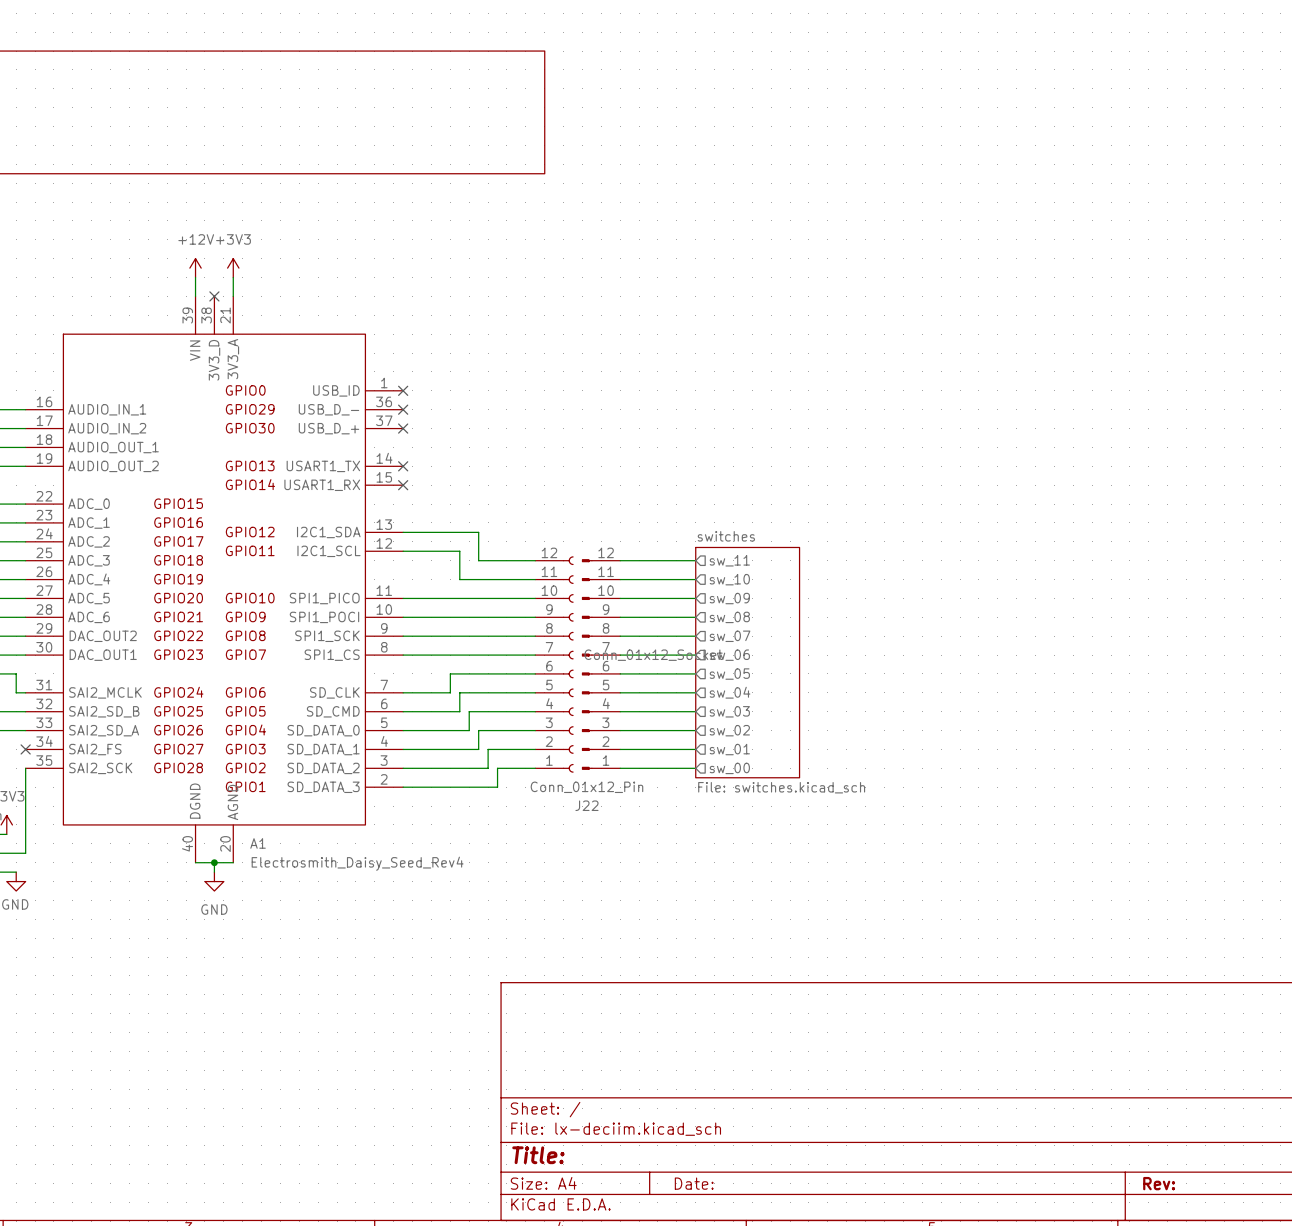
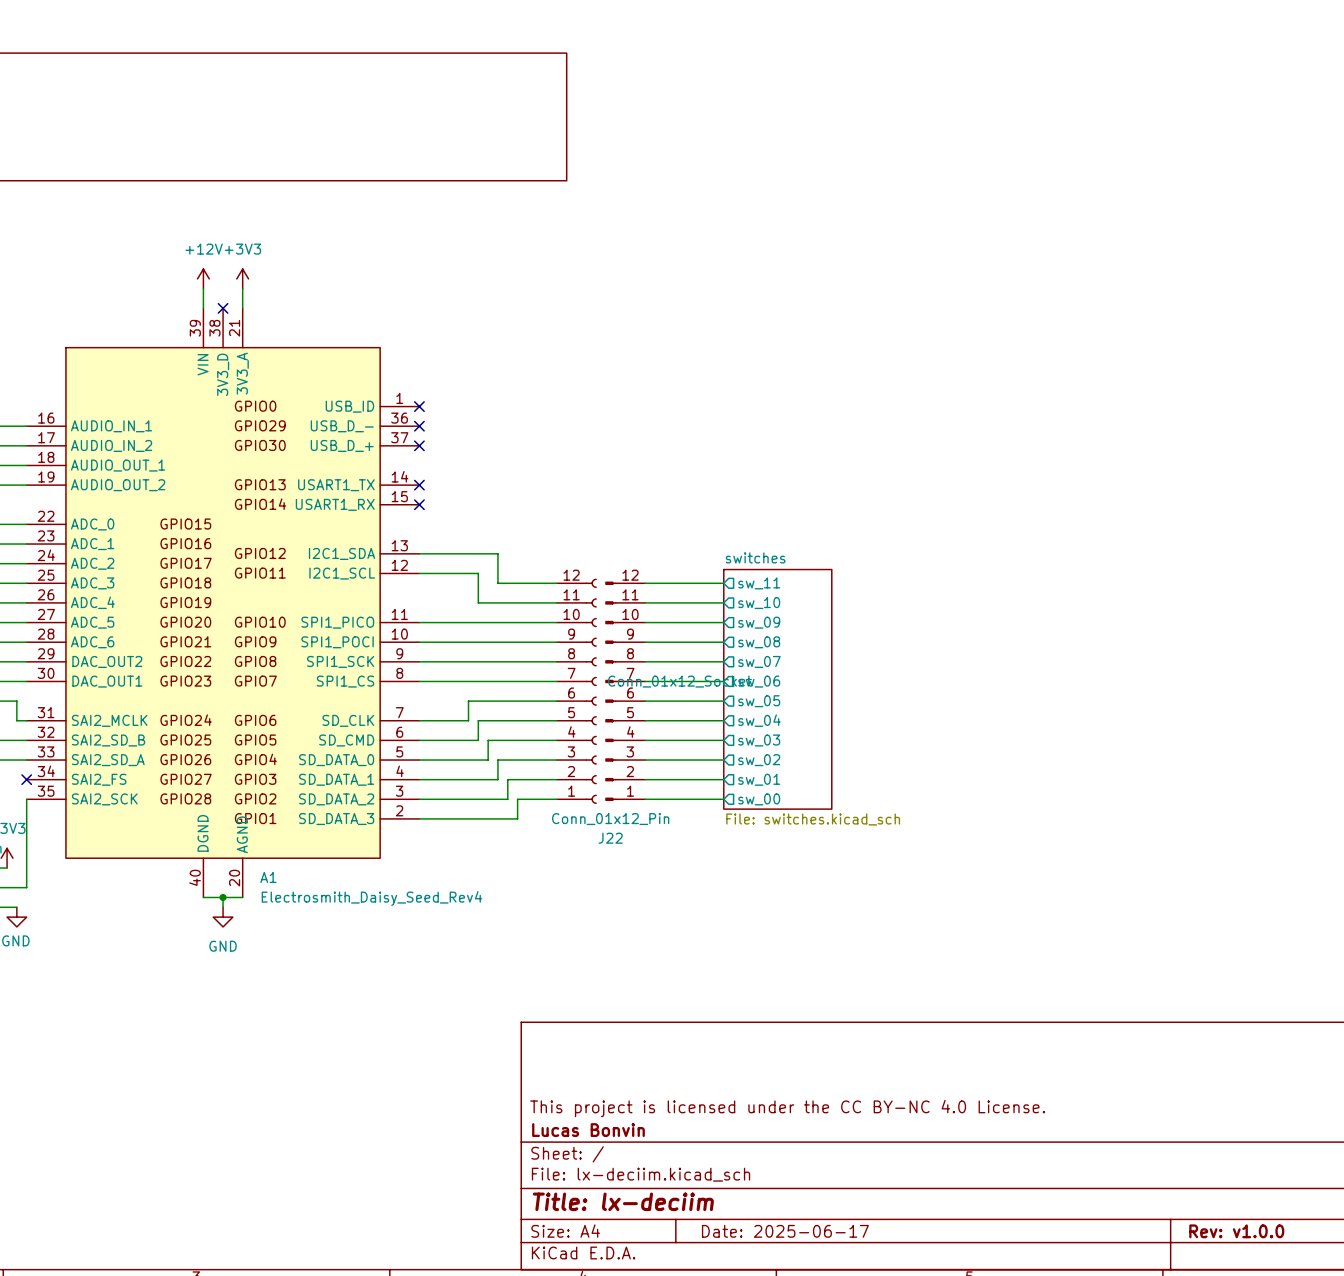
title block: none -> This project is licensed under the CC BY-NC 4.0 License. (787, 1108)
title block: none -> Lucas Bonvin (588, 1130)
title block: Title: (538, 1155) -> Title: lx-deciim (623, 1201)
title block: Date: (694, 1183) -> Date: 2025-06-17 (785, 1231)
title block: Rev: (1159, 1183) -> Rev: v1.0.0 (1236, 1231)

